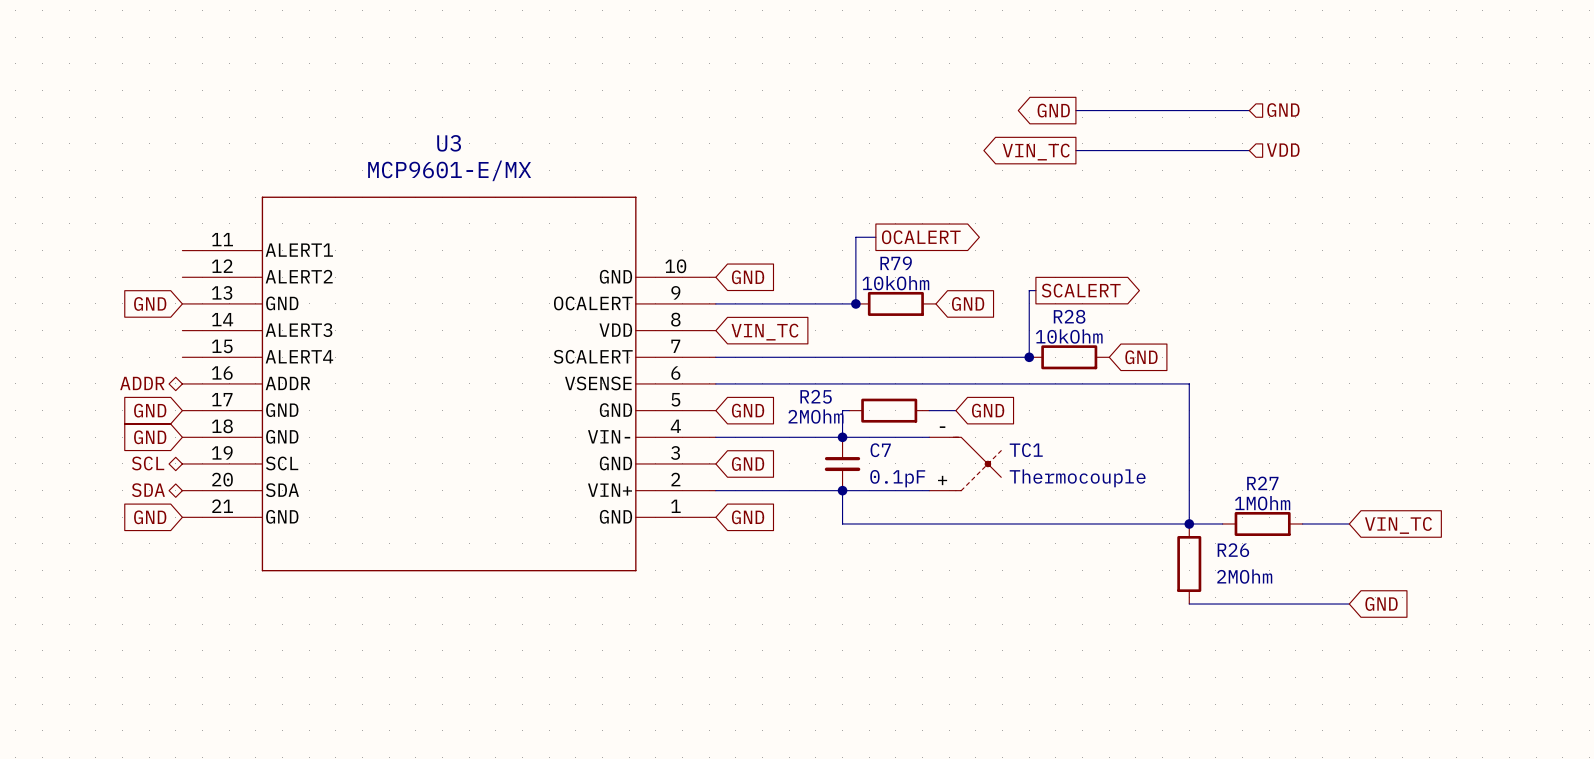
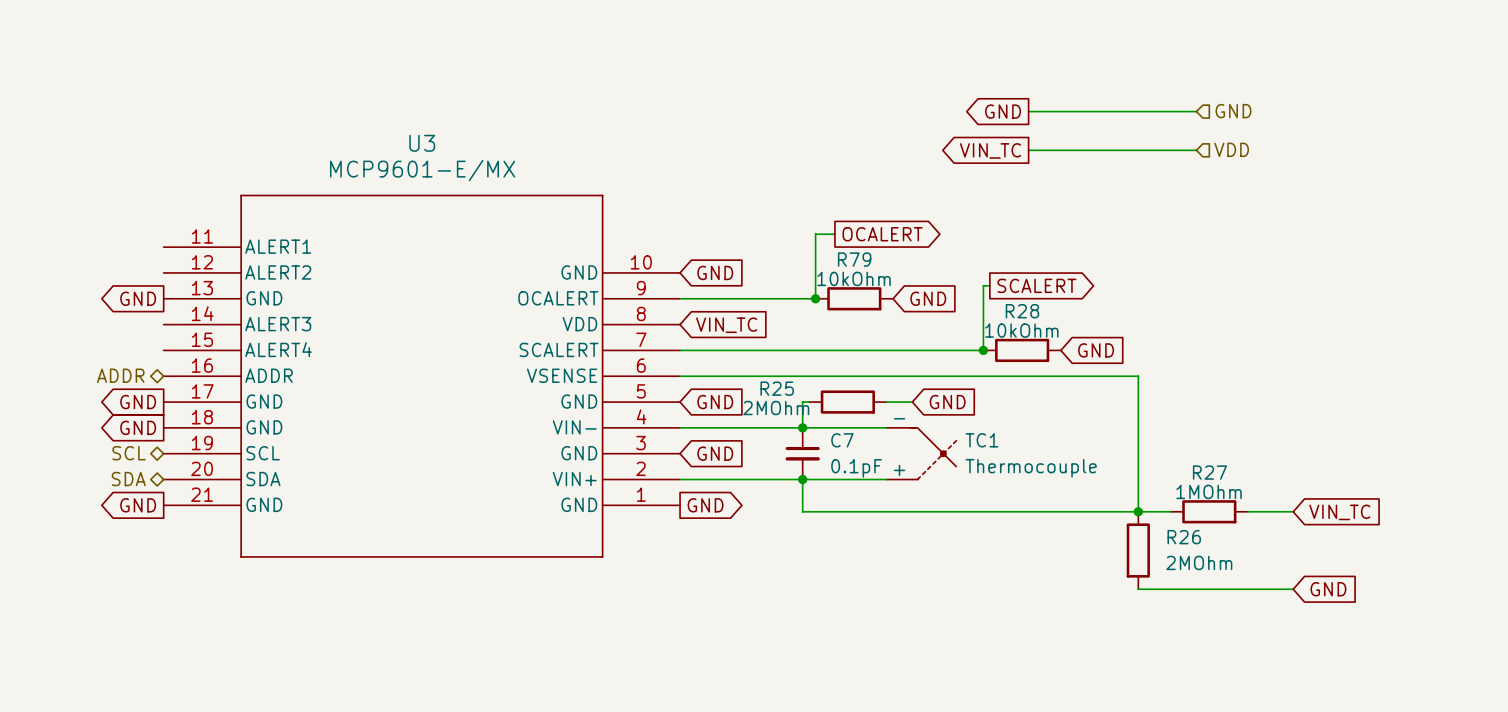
global label shape: input (150, 303) -> output (138, 298)
global label shape: input (150, 410) -> output (138, 402)
global label shape: input (150, 437) -> output (138, 427)
global label shape: input (150, 517) -> output (138, 505)
global label shape: input (748, 517) -> output (705, 505)

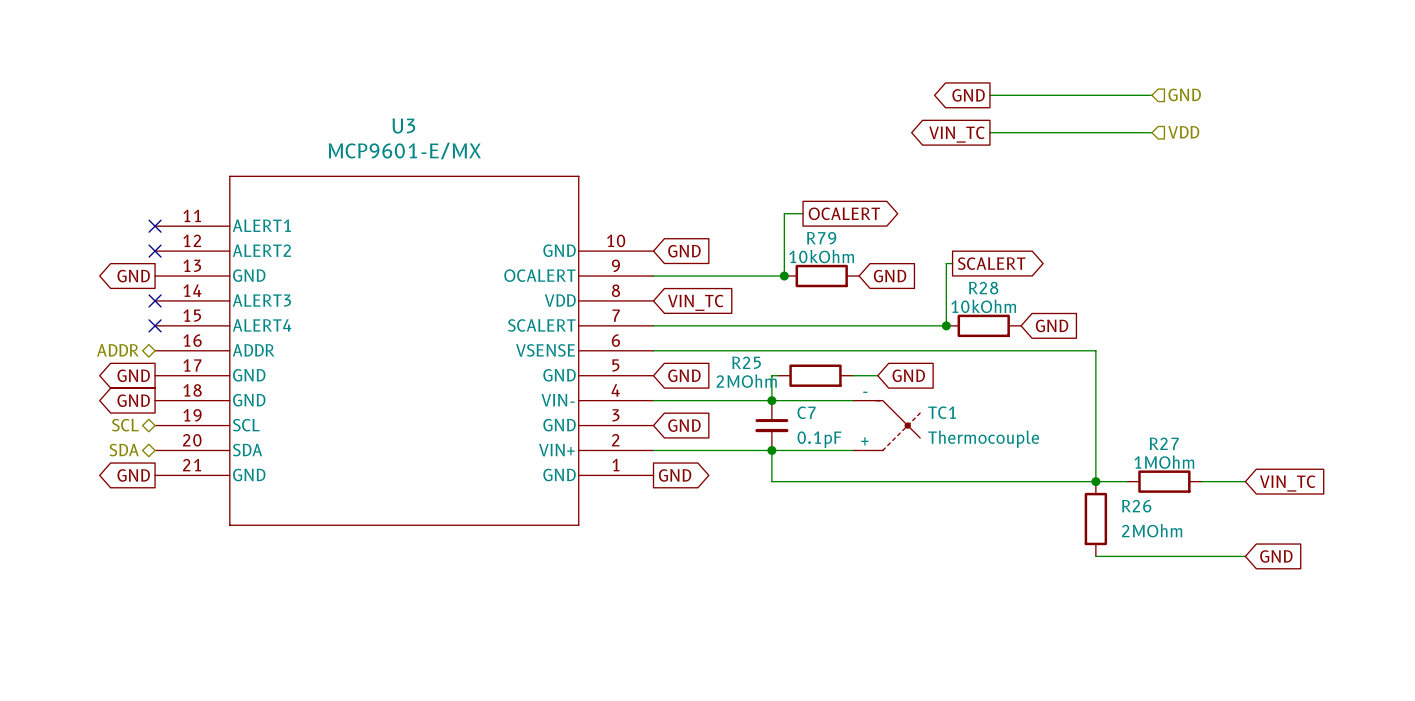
no-connect mark: none -> (155, 226)
no-connect mark: none -> (155, 251)
no-connect mark: none -> (155, 300)
no-connect mark: none -> (155, 325)

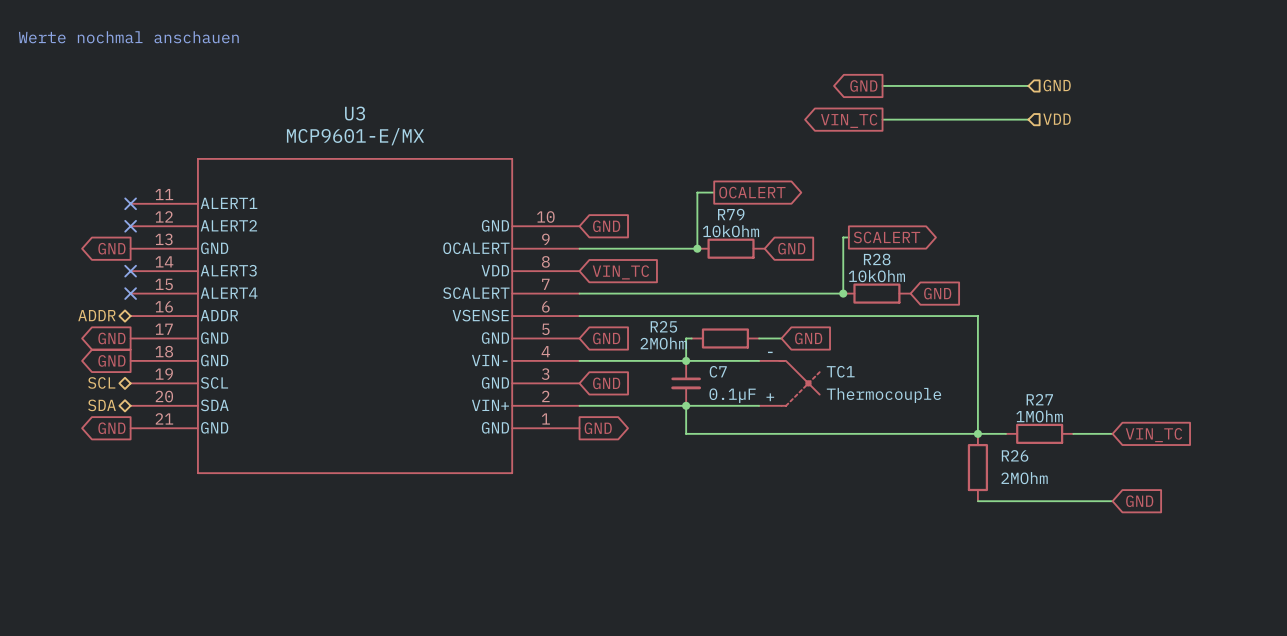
text: none -> Werte nochmal anschauen (128, 37)
C7 value: 0.1pF (819, 439) -> 0.1µF (732, 395)

